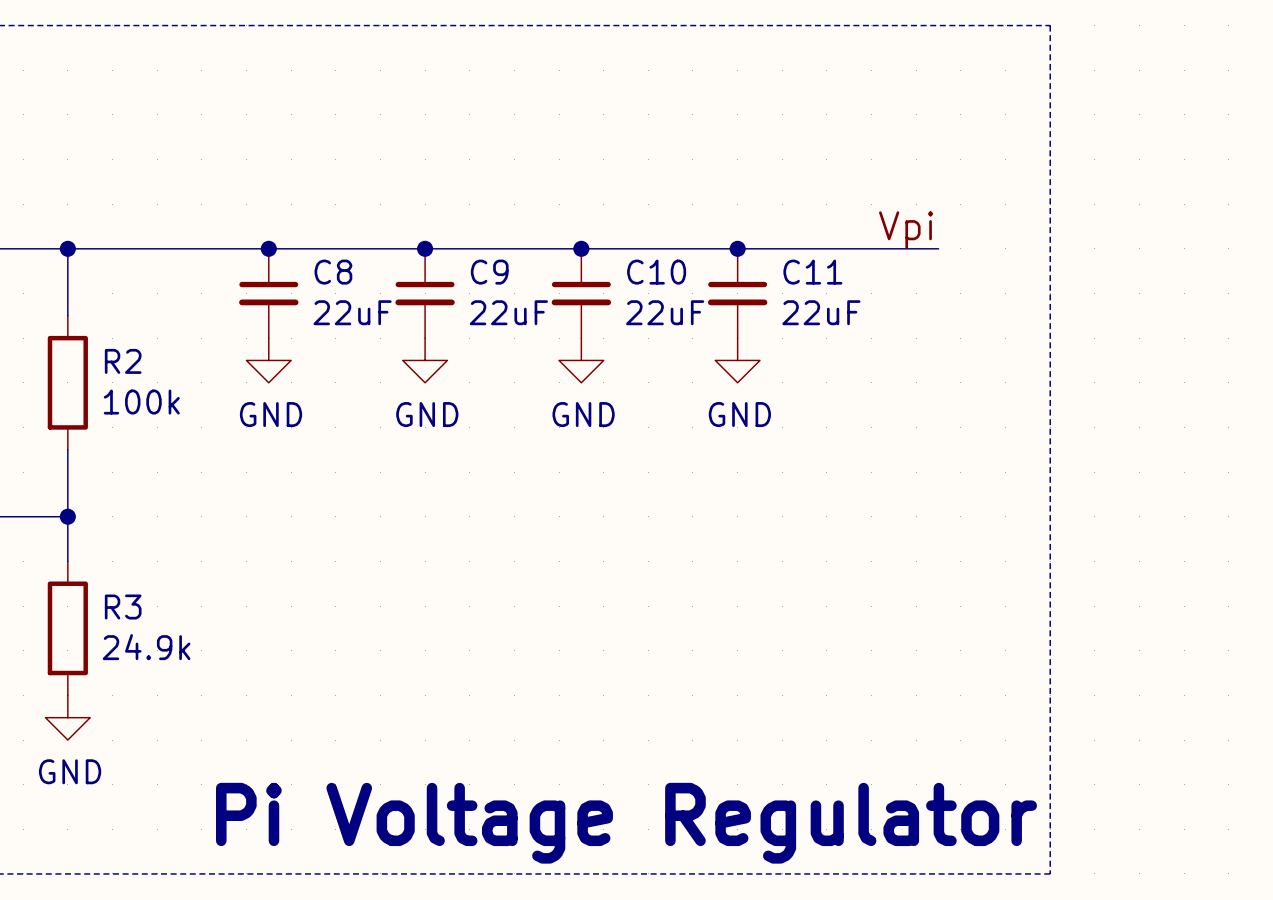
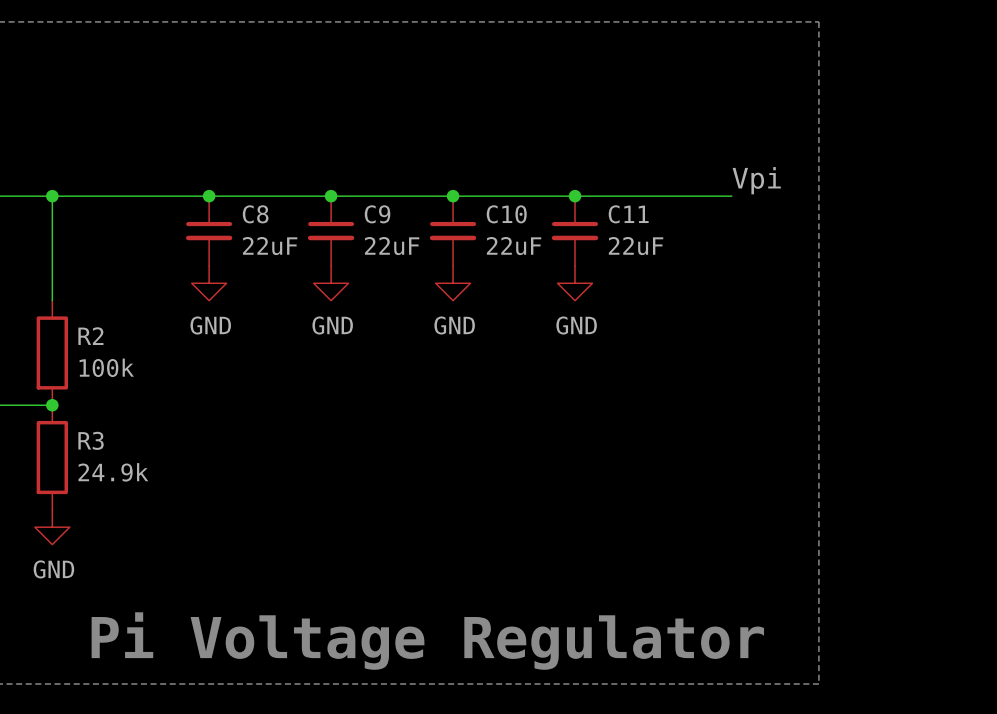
label position: Vpi (906, 230) -> Vpi (756, 180)
wire: none -> (52, 248) (52, 300)
R2 position: (67, 382) -> (52, 352)
wire: (67, 449) (67, 561) -> none
R3 position: (67, 628) -> (52, 457)
power symbol position: GND (67, 717) -> GND (52, 527)
text position: Pi Voltage Regulator (626, 823) -> Pi Voltage Regulator (427, 641)

